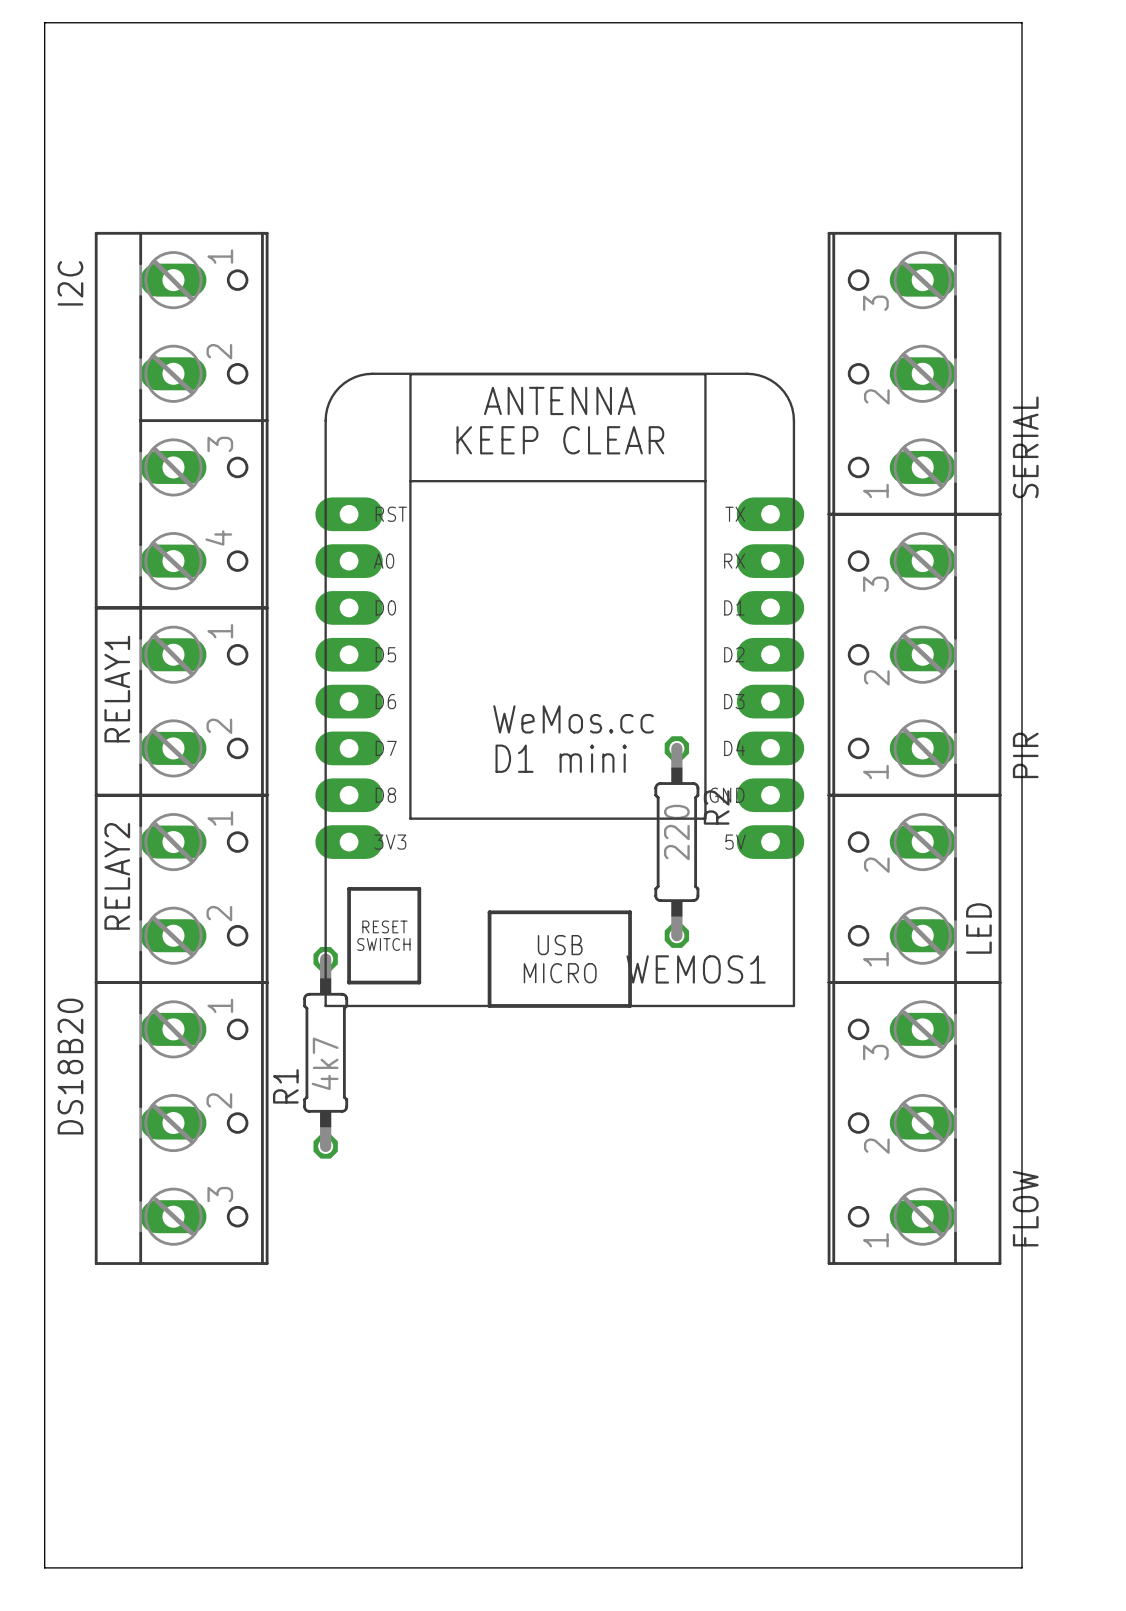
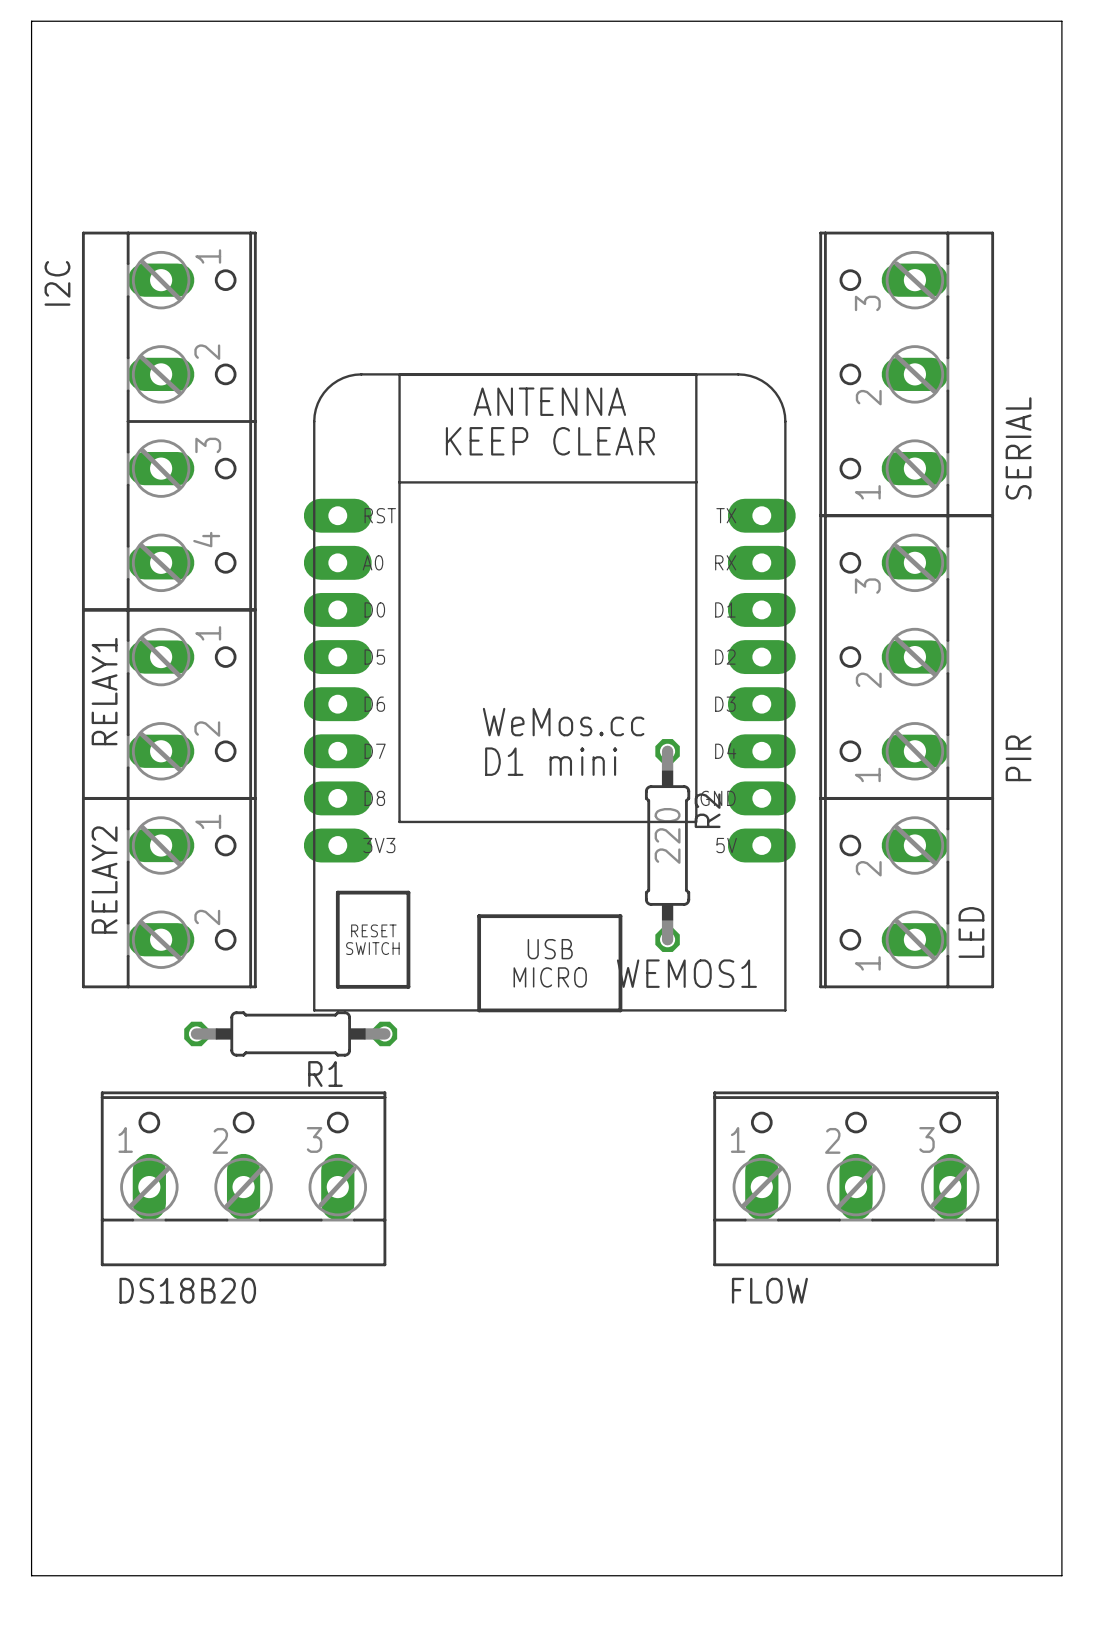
board edge: (1021, 22) (1021, 1567) -> (1014, 21) (1061, 21) (1061, 1575) (1014, 1575)
DS18B20 footprint: [94, 981, 269, 1265] -> [100, 1091, 387, 1267]
R1 rotation: 0° (325, 1052) -> 90° clockwise (290, 1033)
R1 value: 4k7 (325, 1063) -> none
DS18B20 name position: DS18B20 (70, 1066) -> DS18B20 (187, 1290)
R1 name position: R1 (285, 1086) -> R1 (325, 1074)
FLOW rotation: 0° (914, 1123) -> 90° clockwise (856, 1178)

